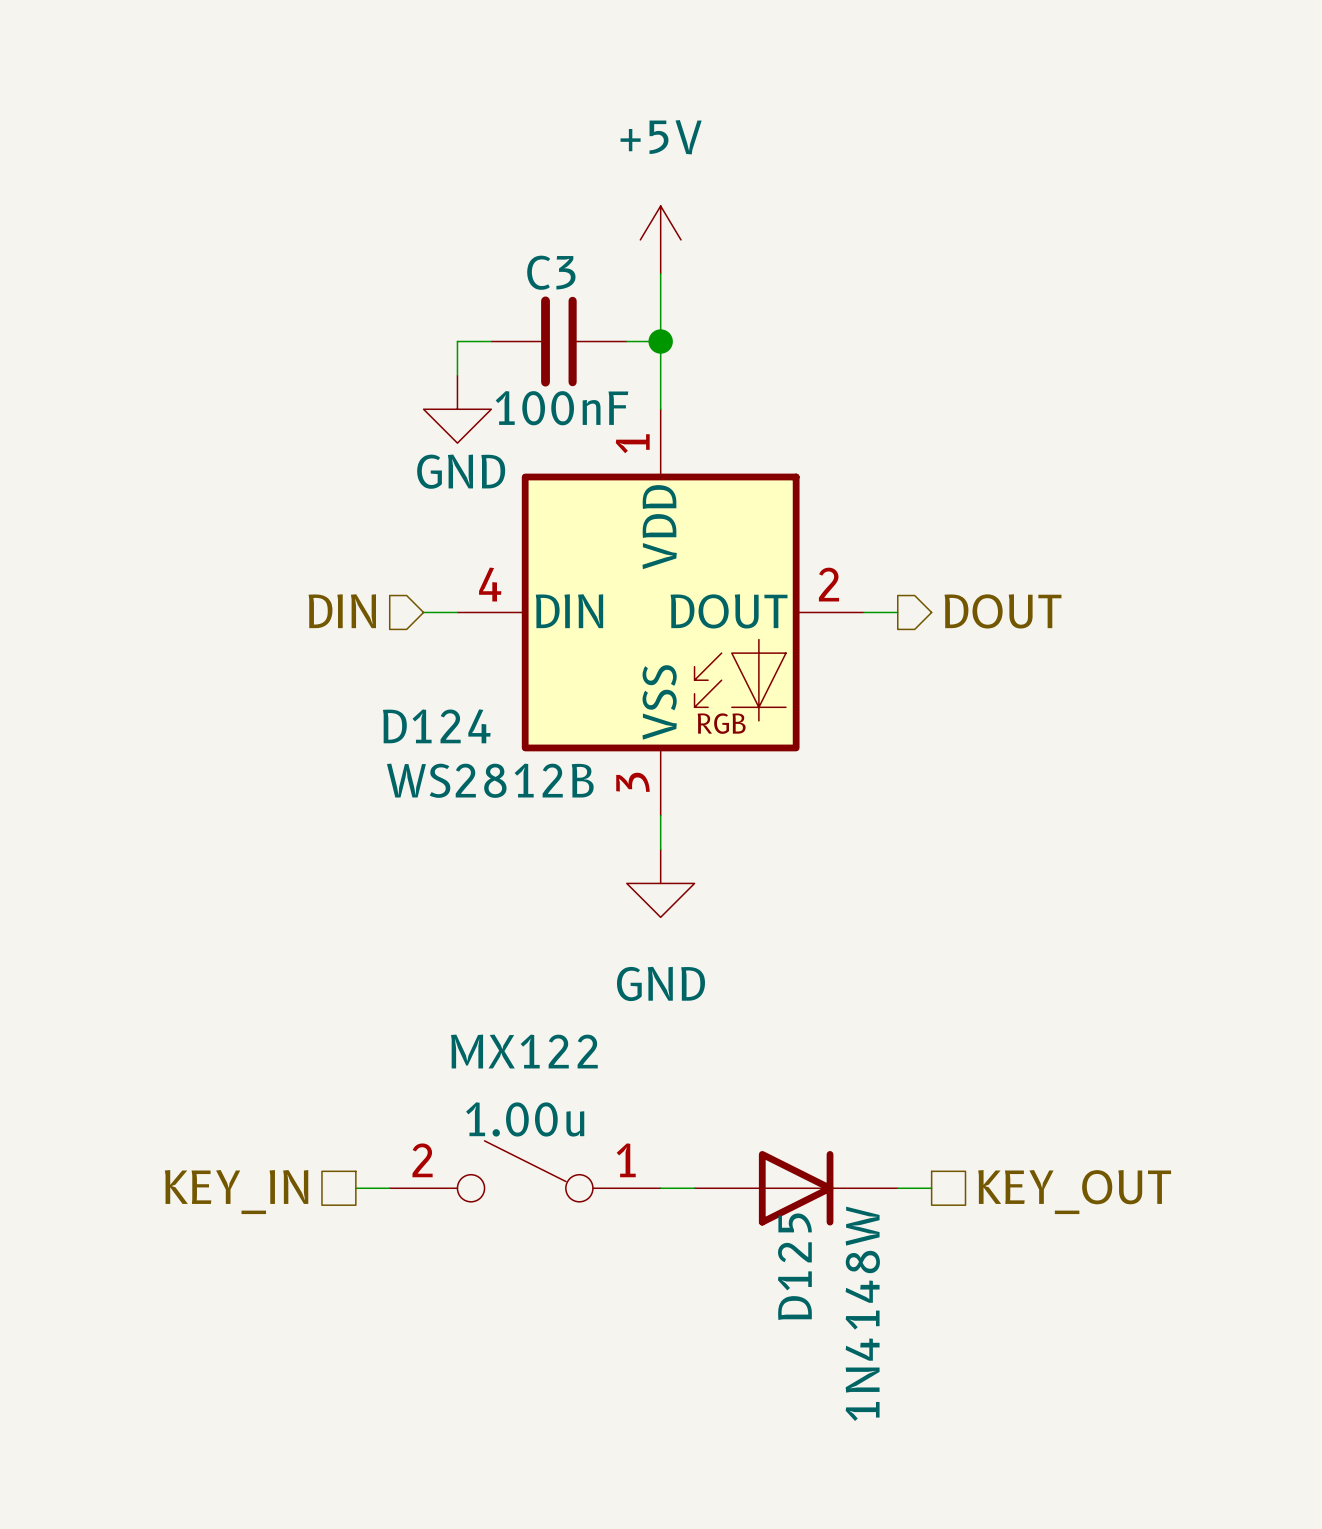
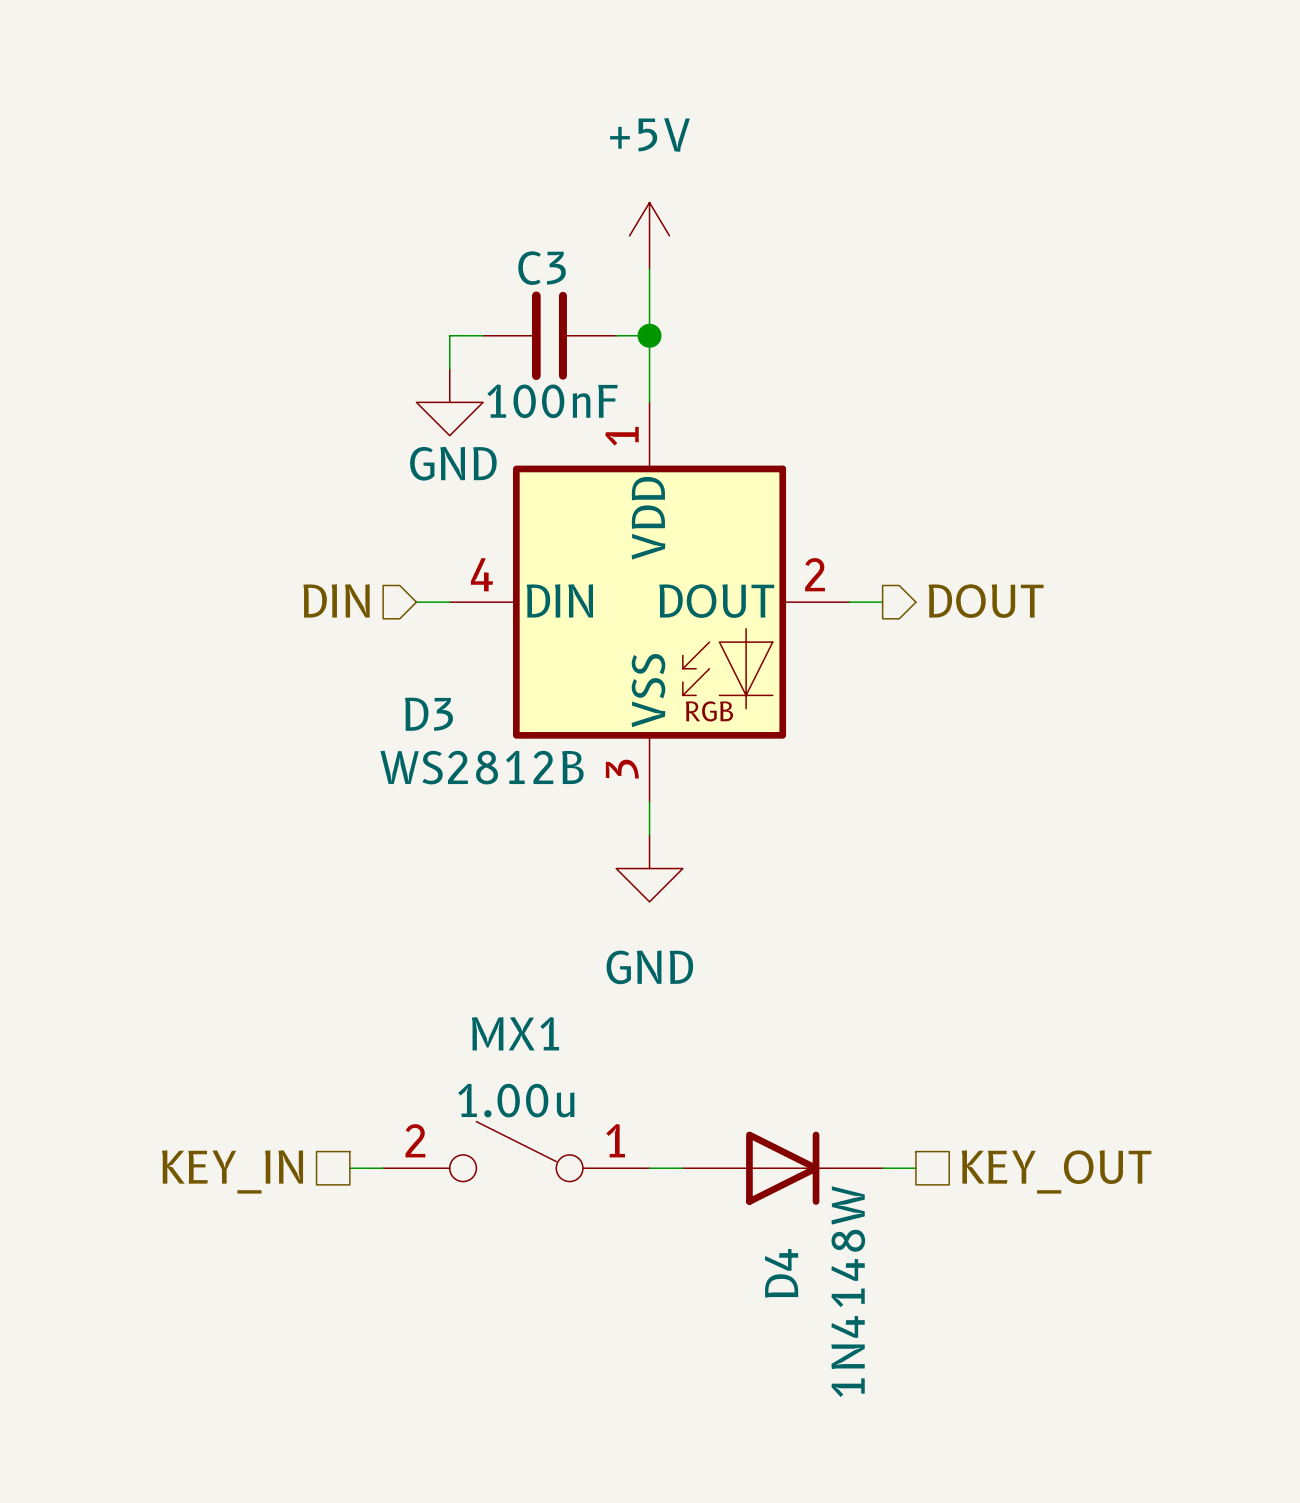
D124 name: D124 (436, 726) -> D3 (428, 714)
MX122 name: MX122 (524, 1051) -> MX1 (515, 1033)
D125 name: D125 (794, 1266) -> D4 (781, 1273)

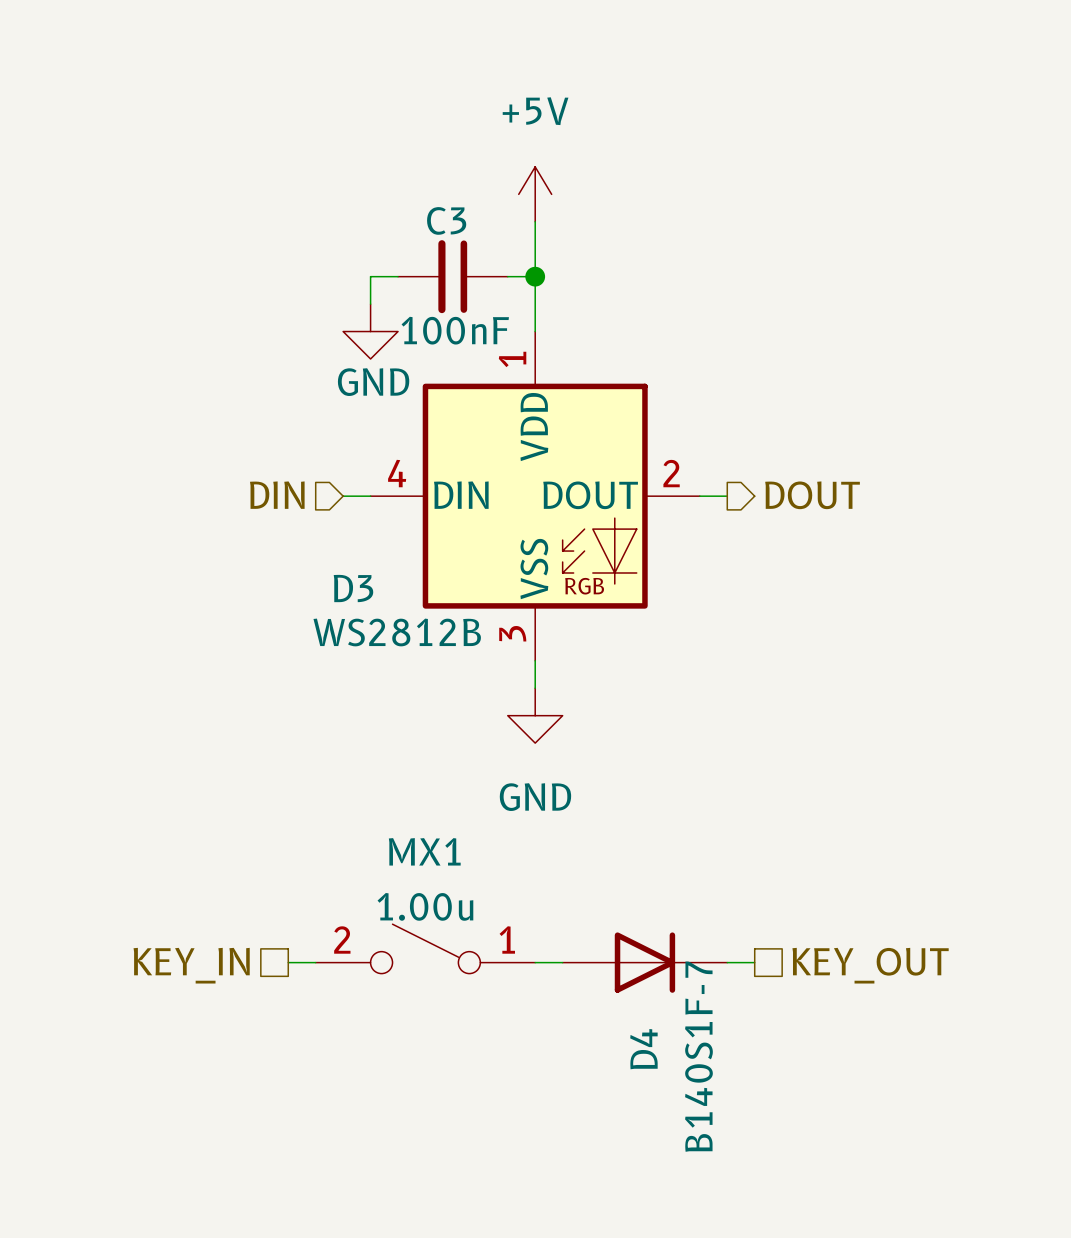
D4 value: 1N4148W (848, 1291) -> B140S1F-7 (698, 1056)

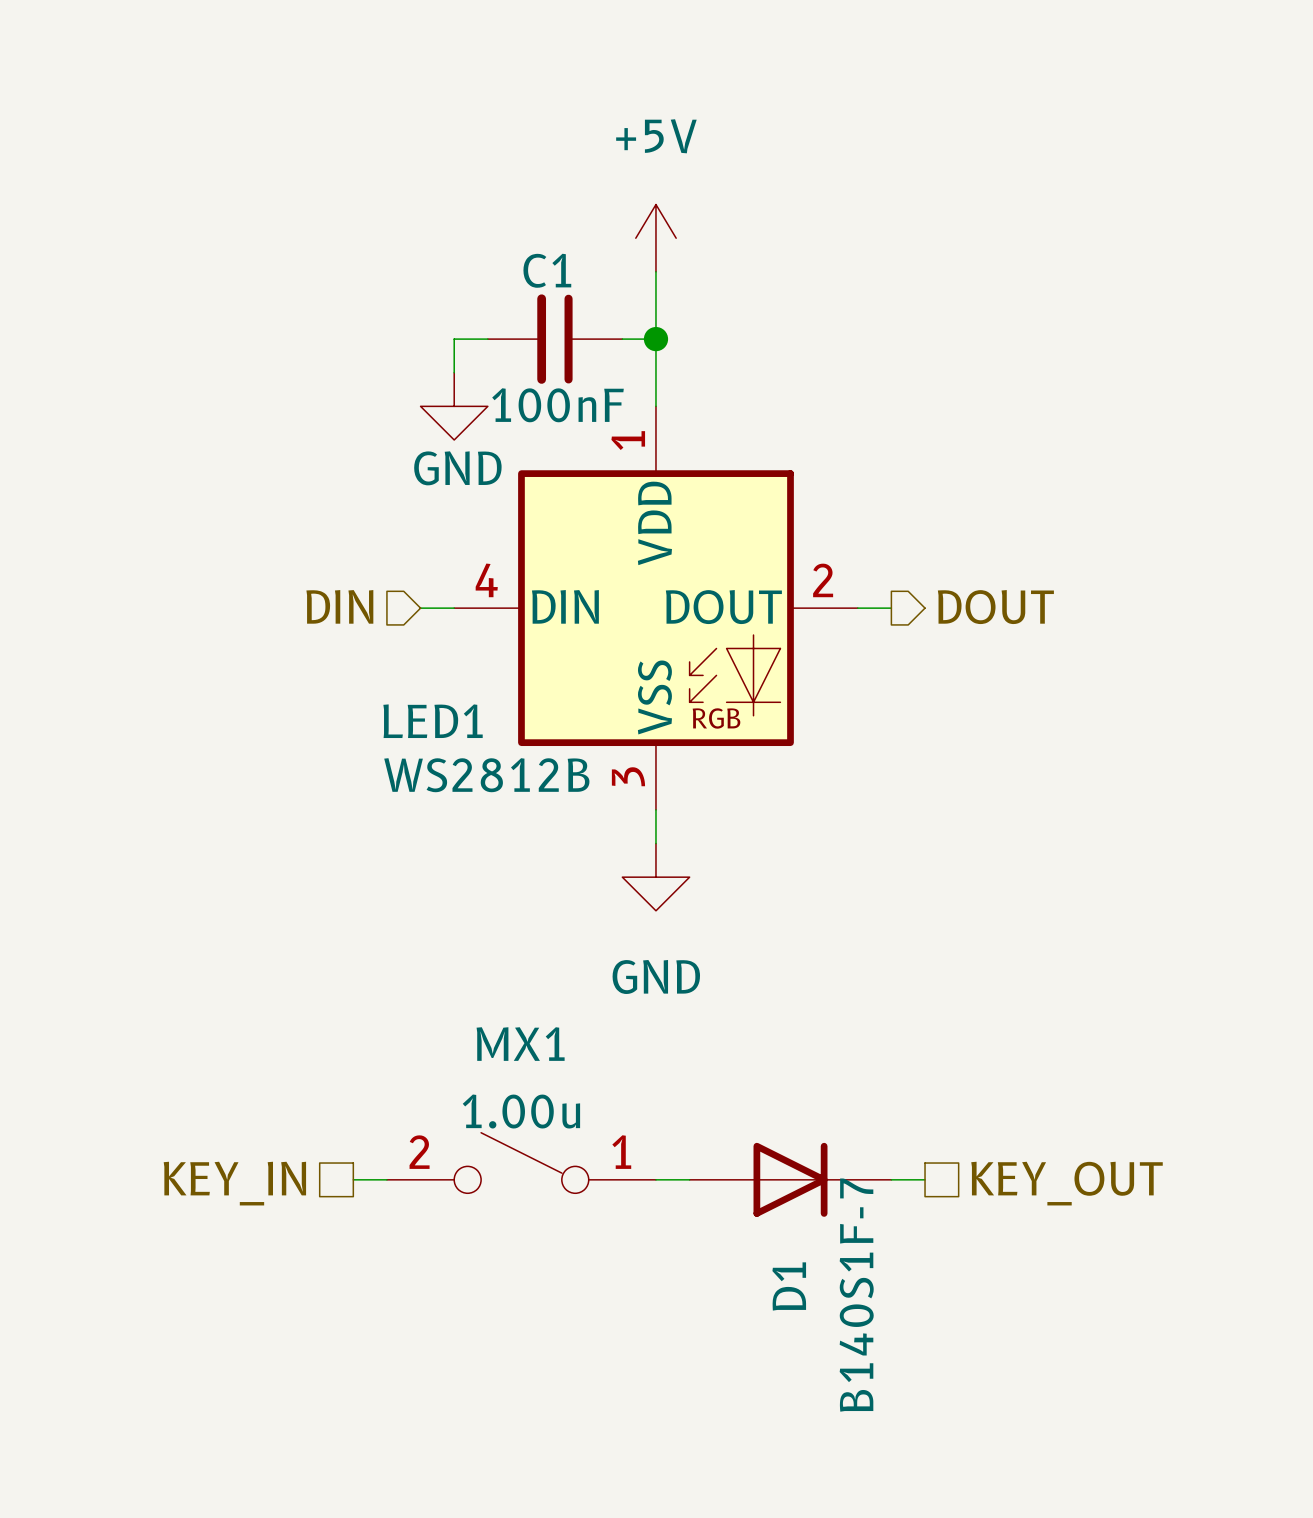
C3 name: C3 (446, 220) -> C1 (547, 270)
D3 name: D3 (353, 588) -> LED1 (433, 721)
D4 name: D4 (643, 1049) -> D1 (789, 1286)

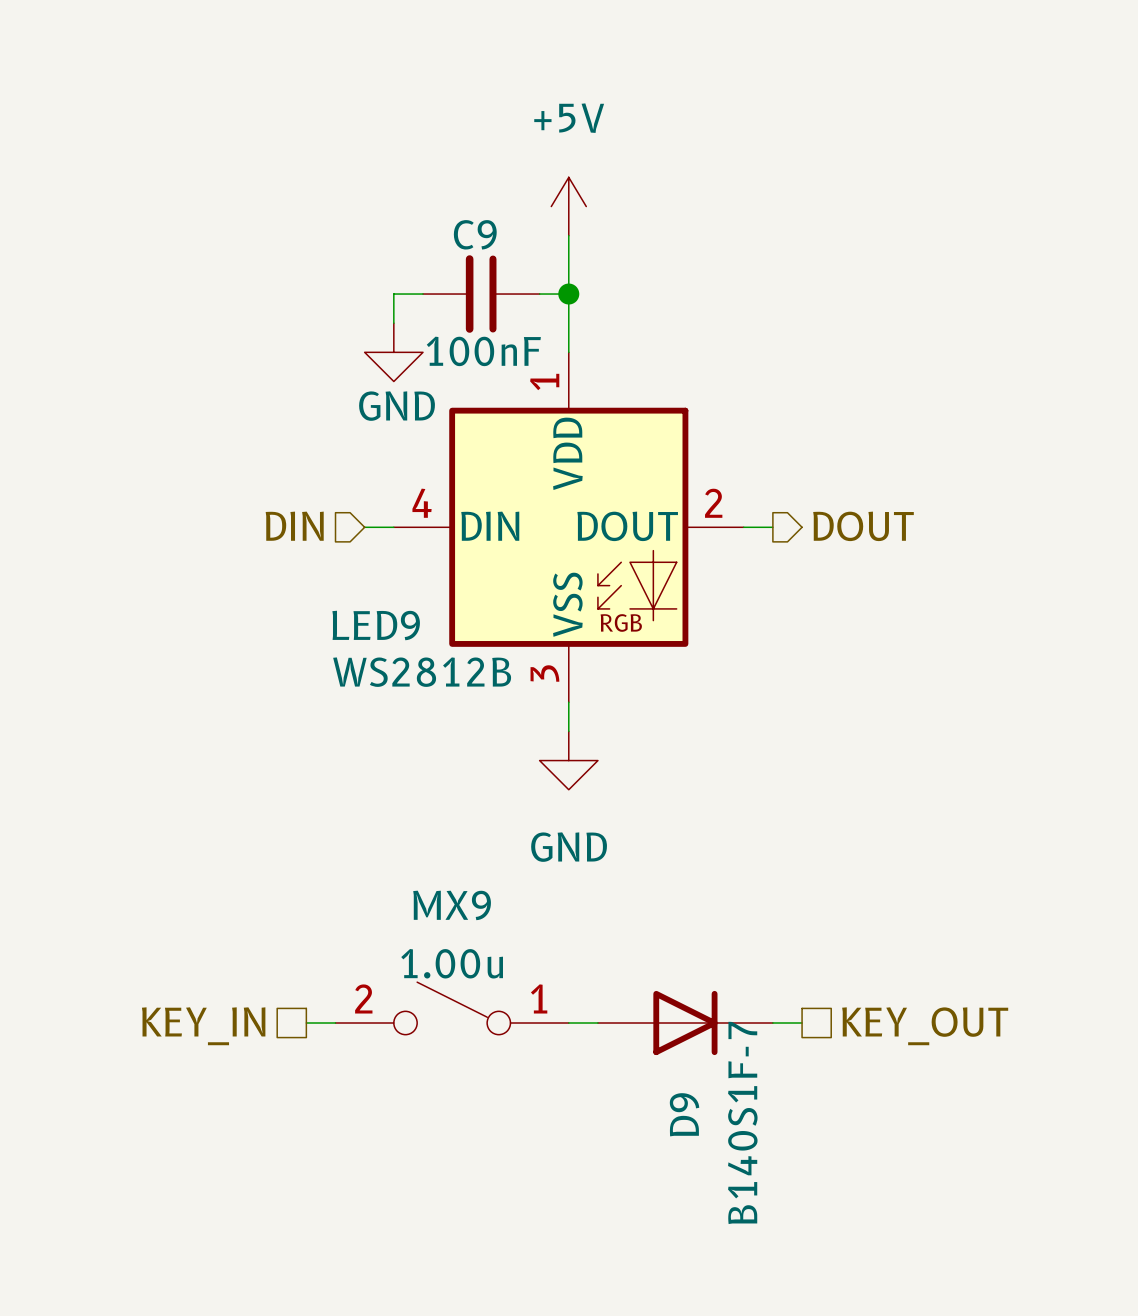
C1 name: C1 (547, 270) -> C9 (475, 234)
LED1 name: LED1 (433, 721) -> LED9 (376, 625)
MX1 name: MX1 (520, 1044) -> MX9 (452, 905)
D1 name: D1 (789, 1286) -> D9 (684, 1114)

